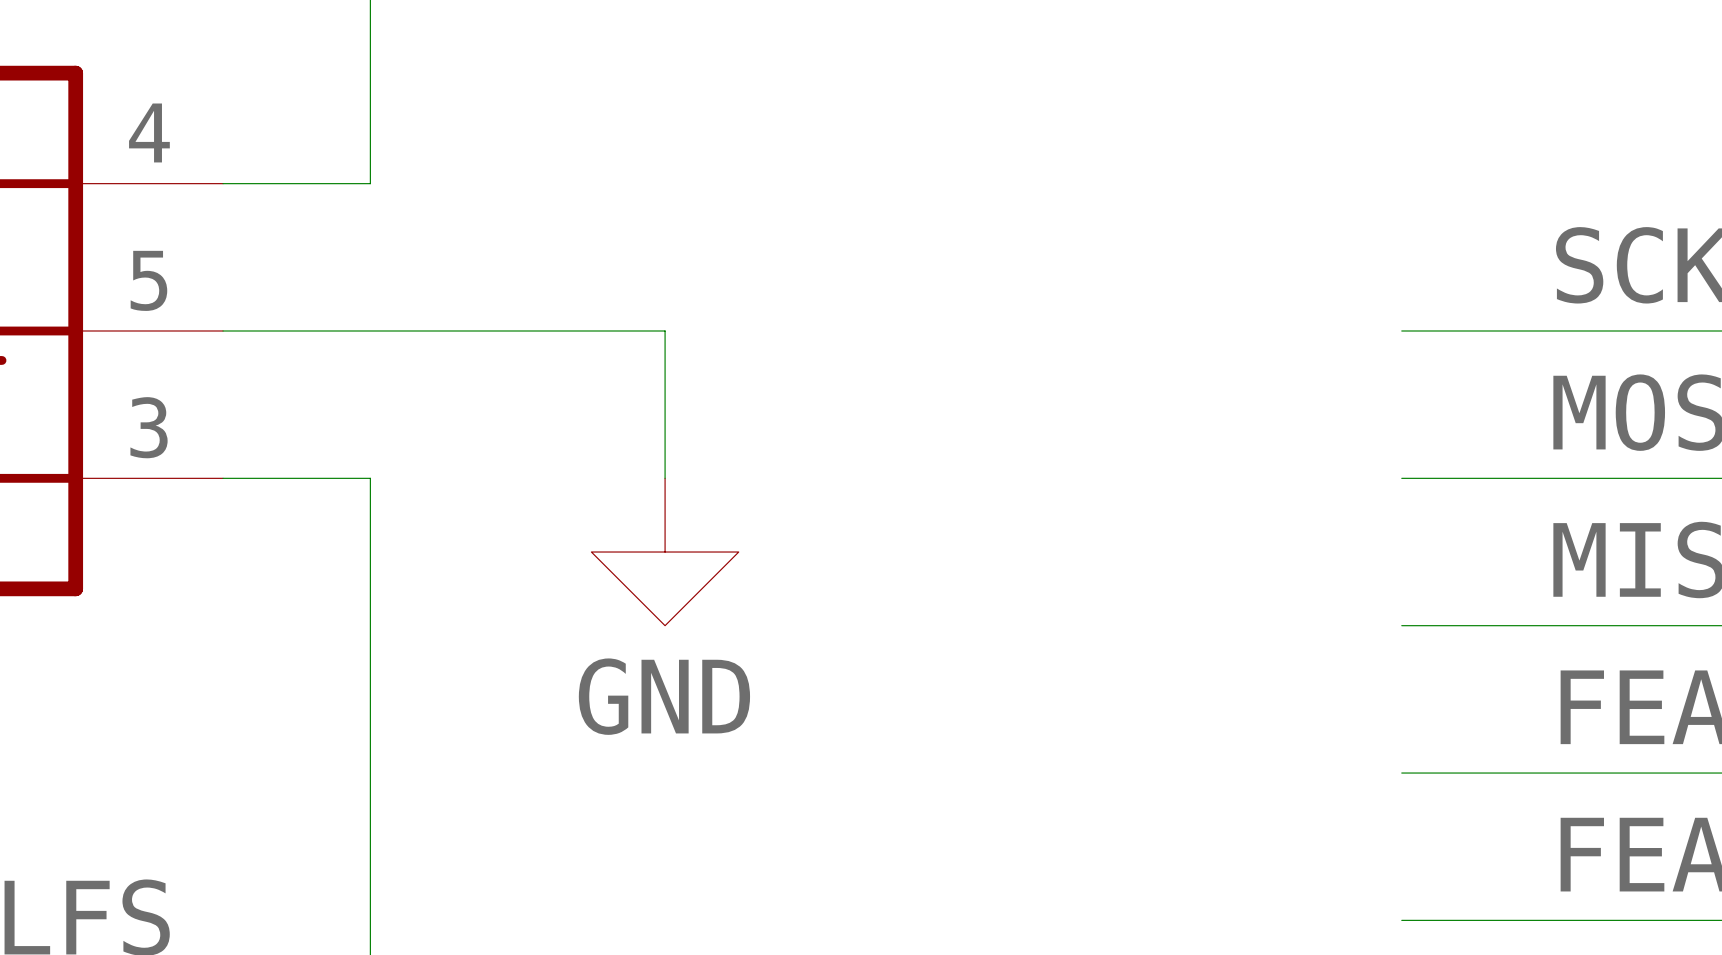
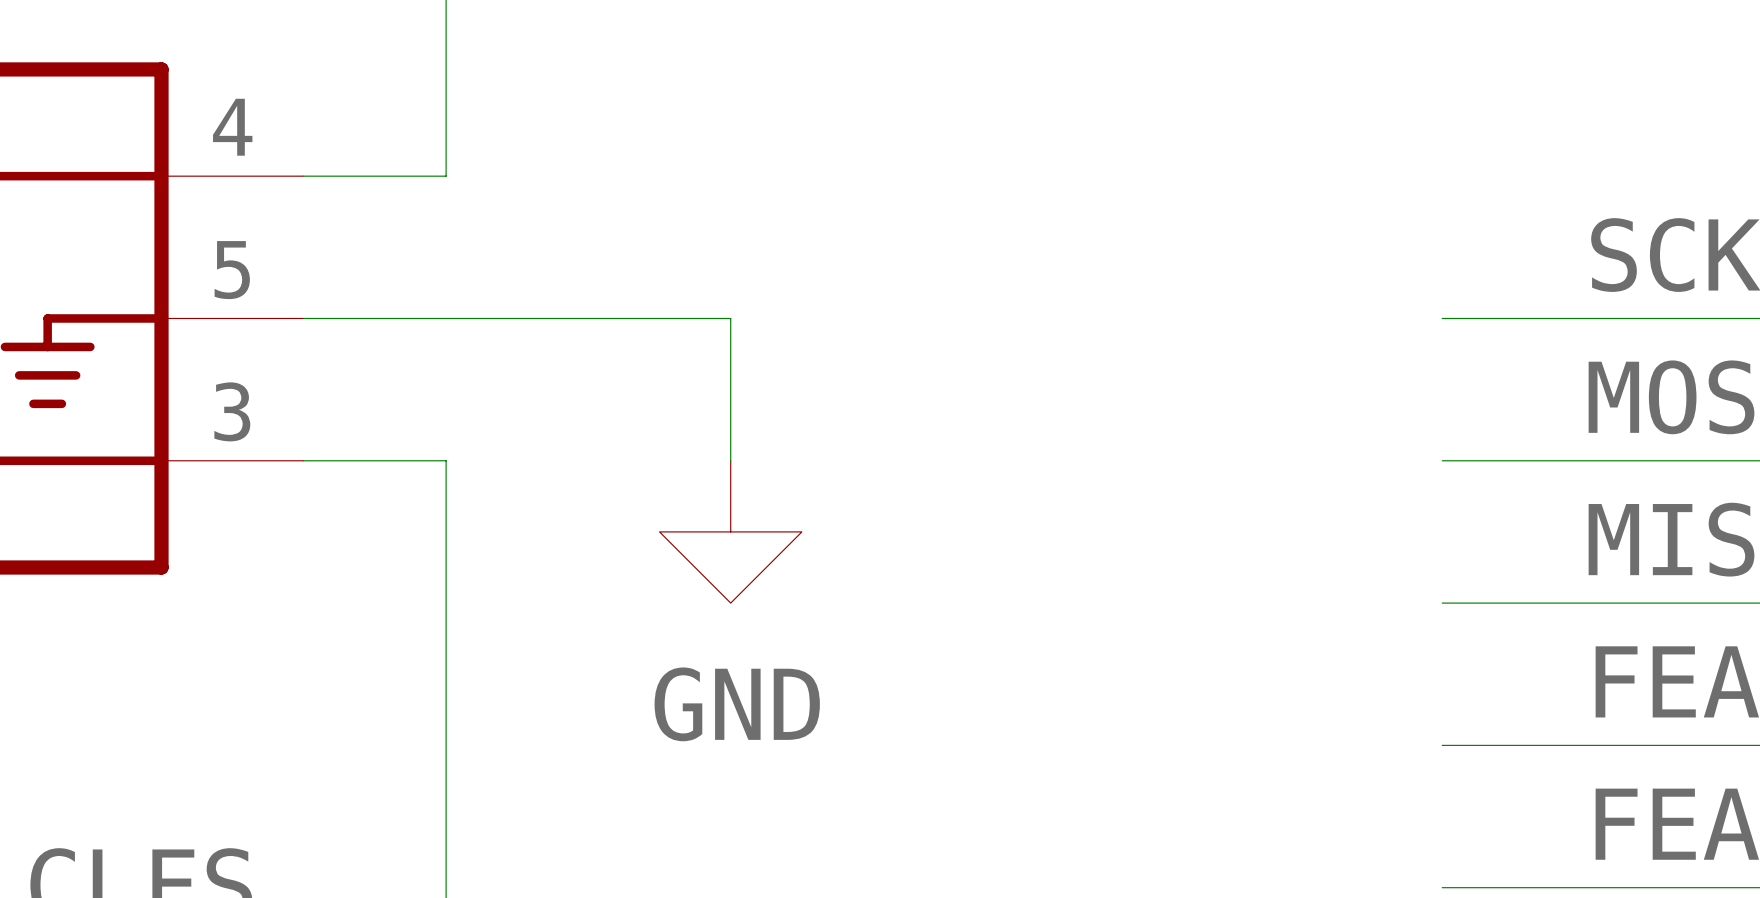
power symbol text position: GND (664, 696) -> GND (737, 704)

